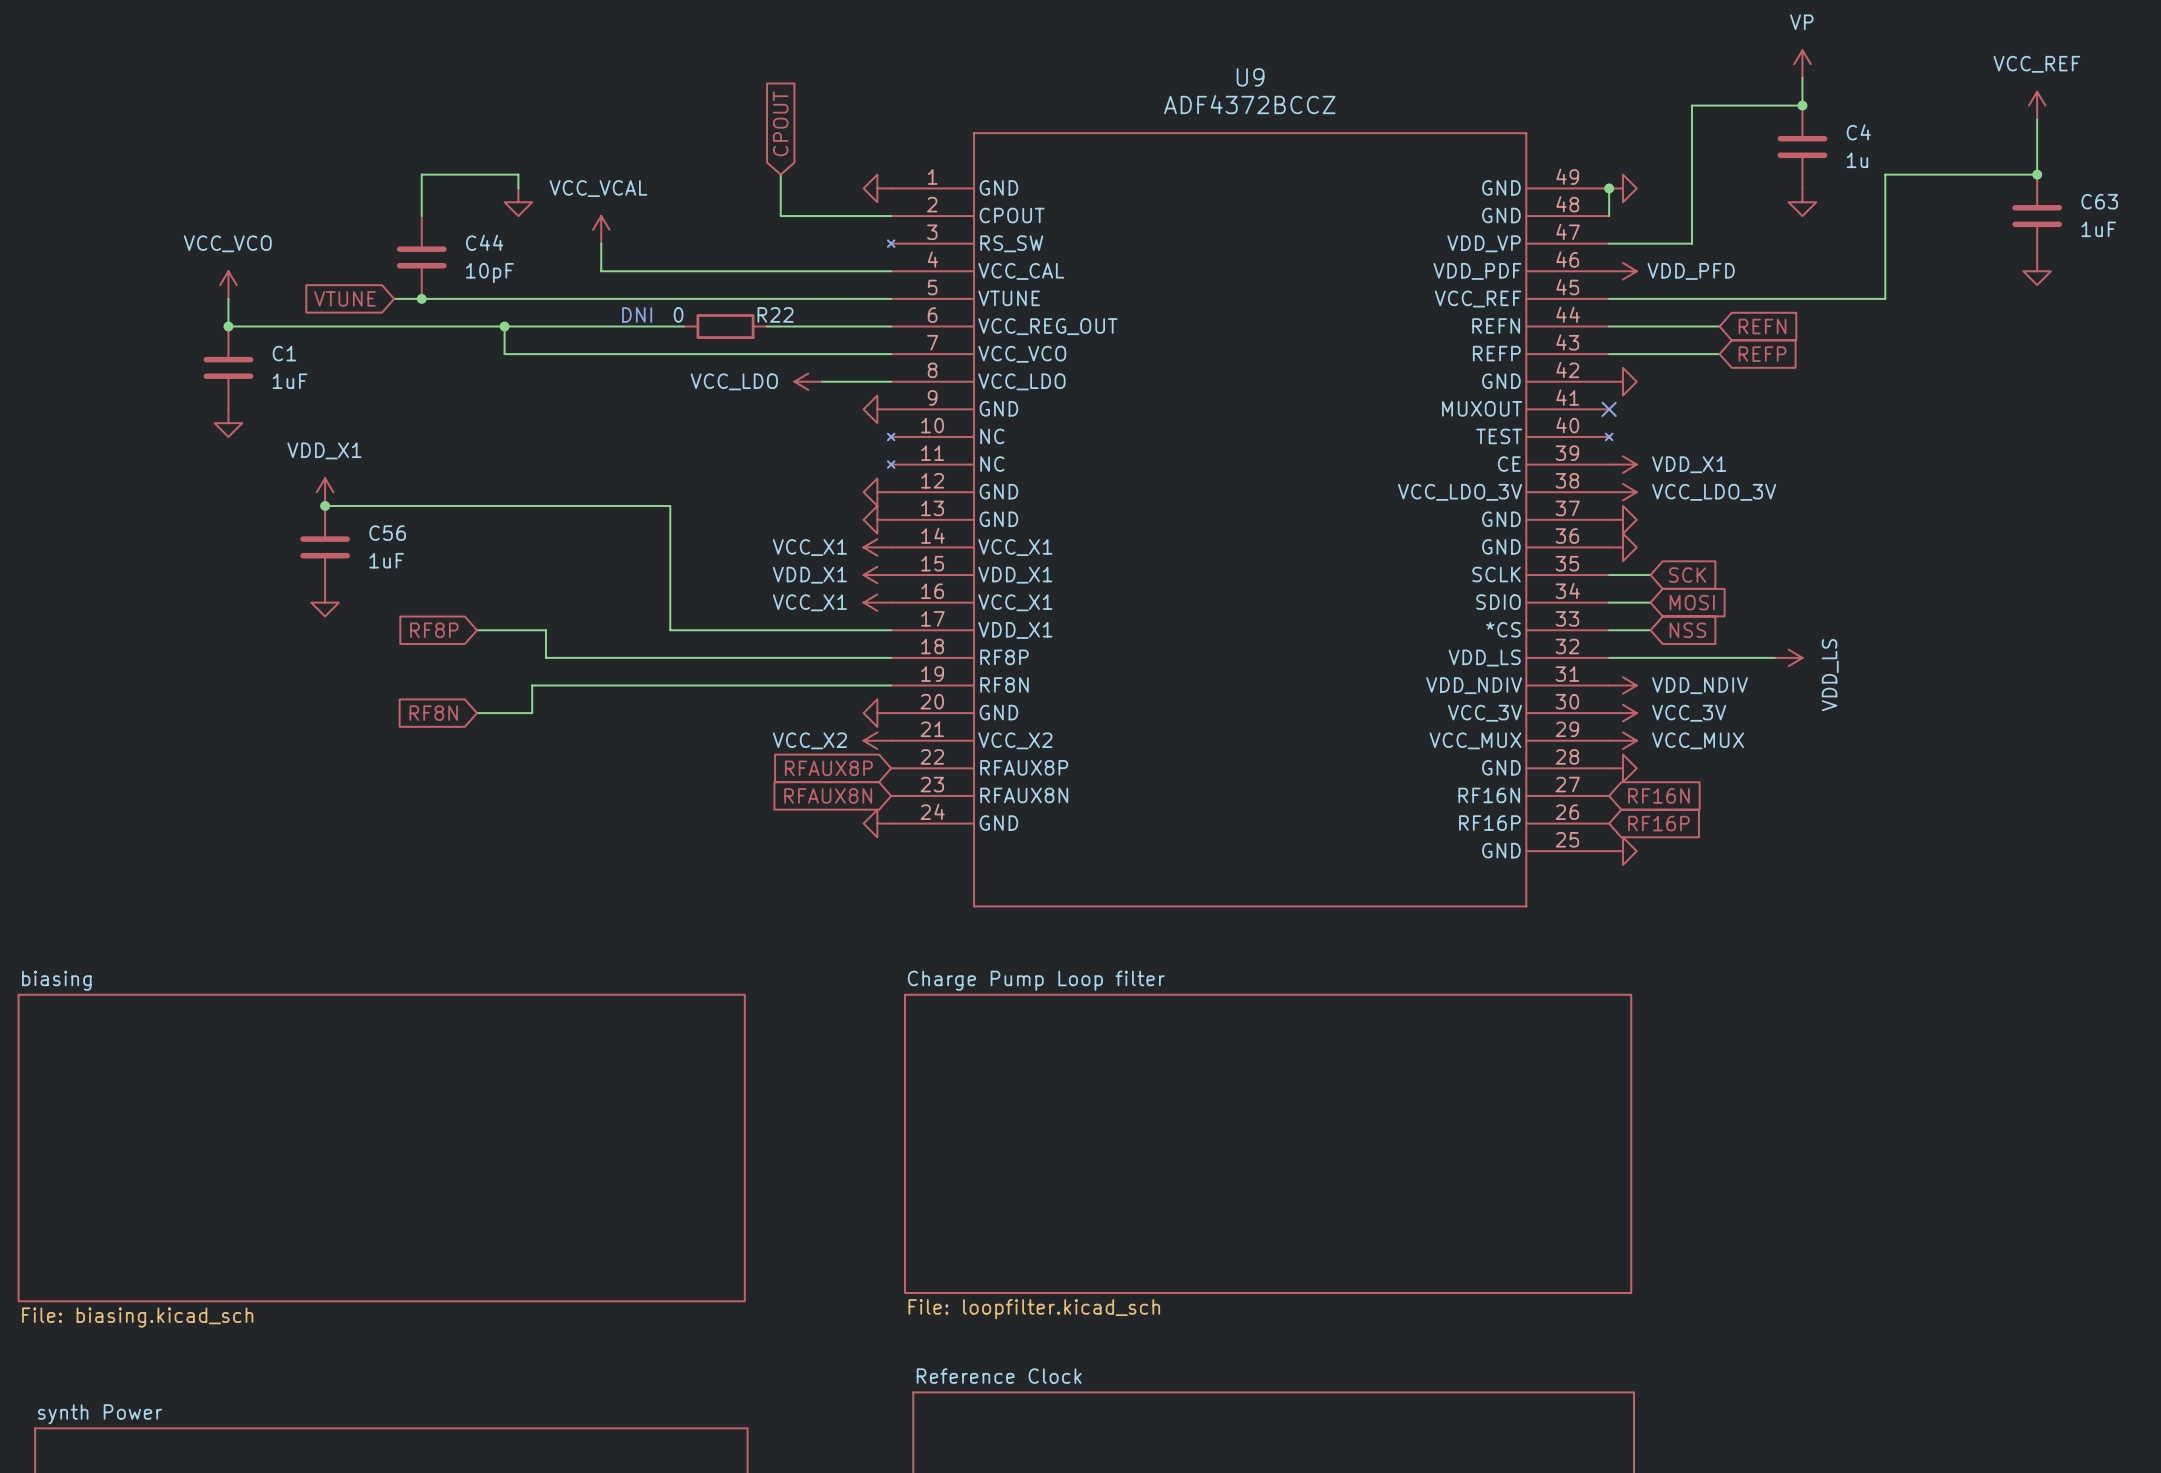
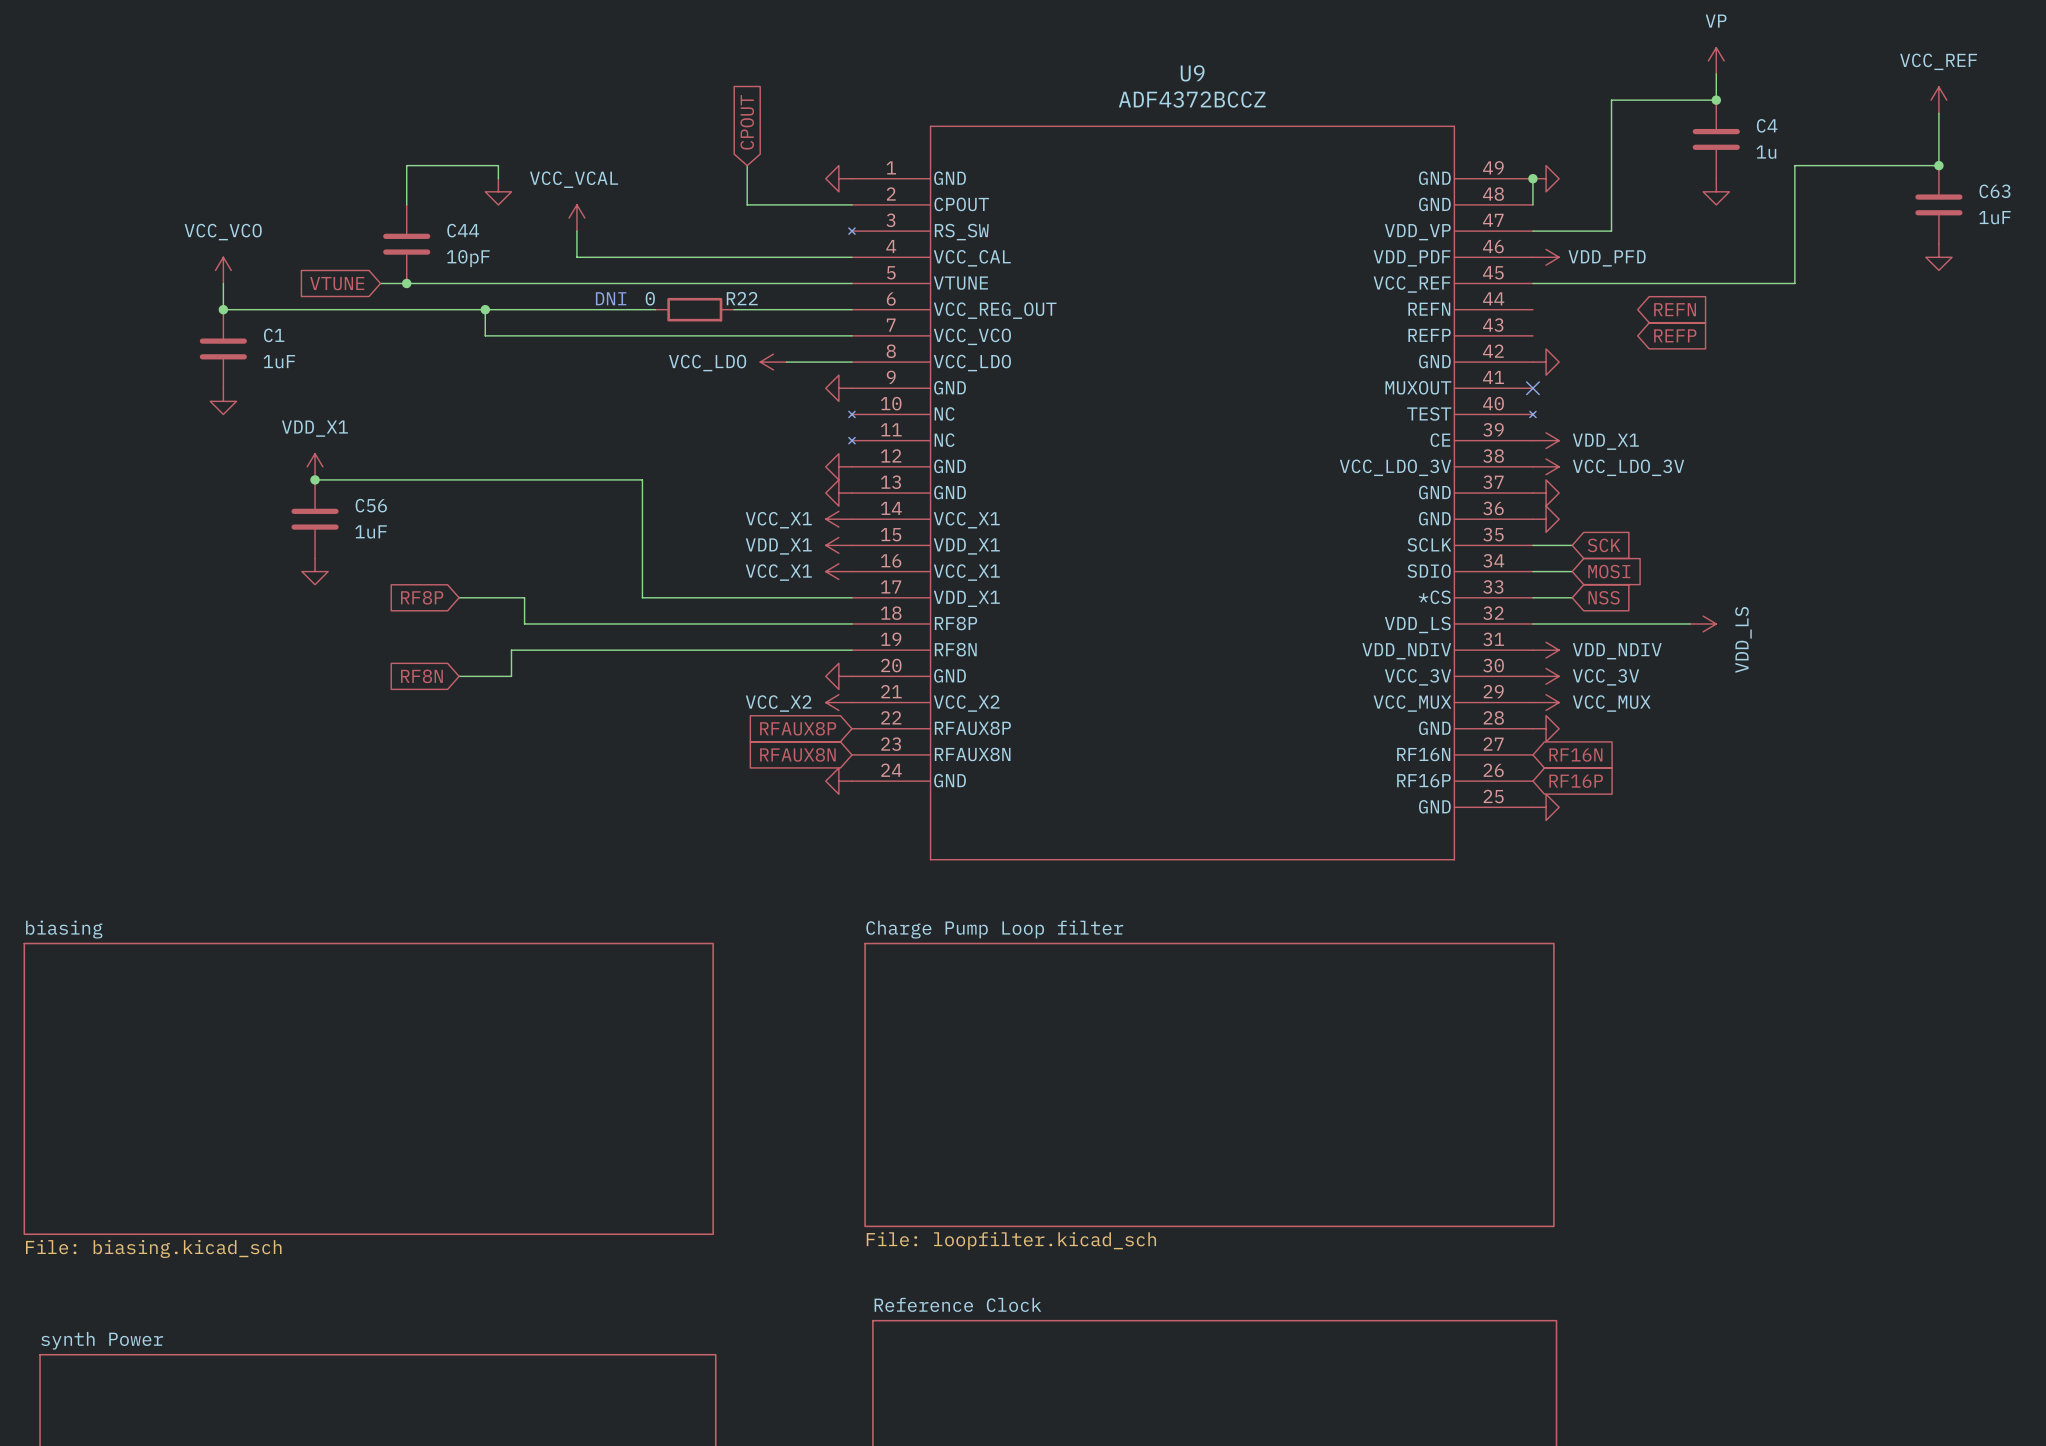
wire: (1609, 326) (1719, 326) -> none
wire: (1609, 354) (1719, 354) -> none

